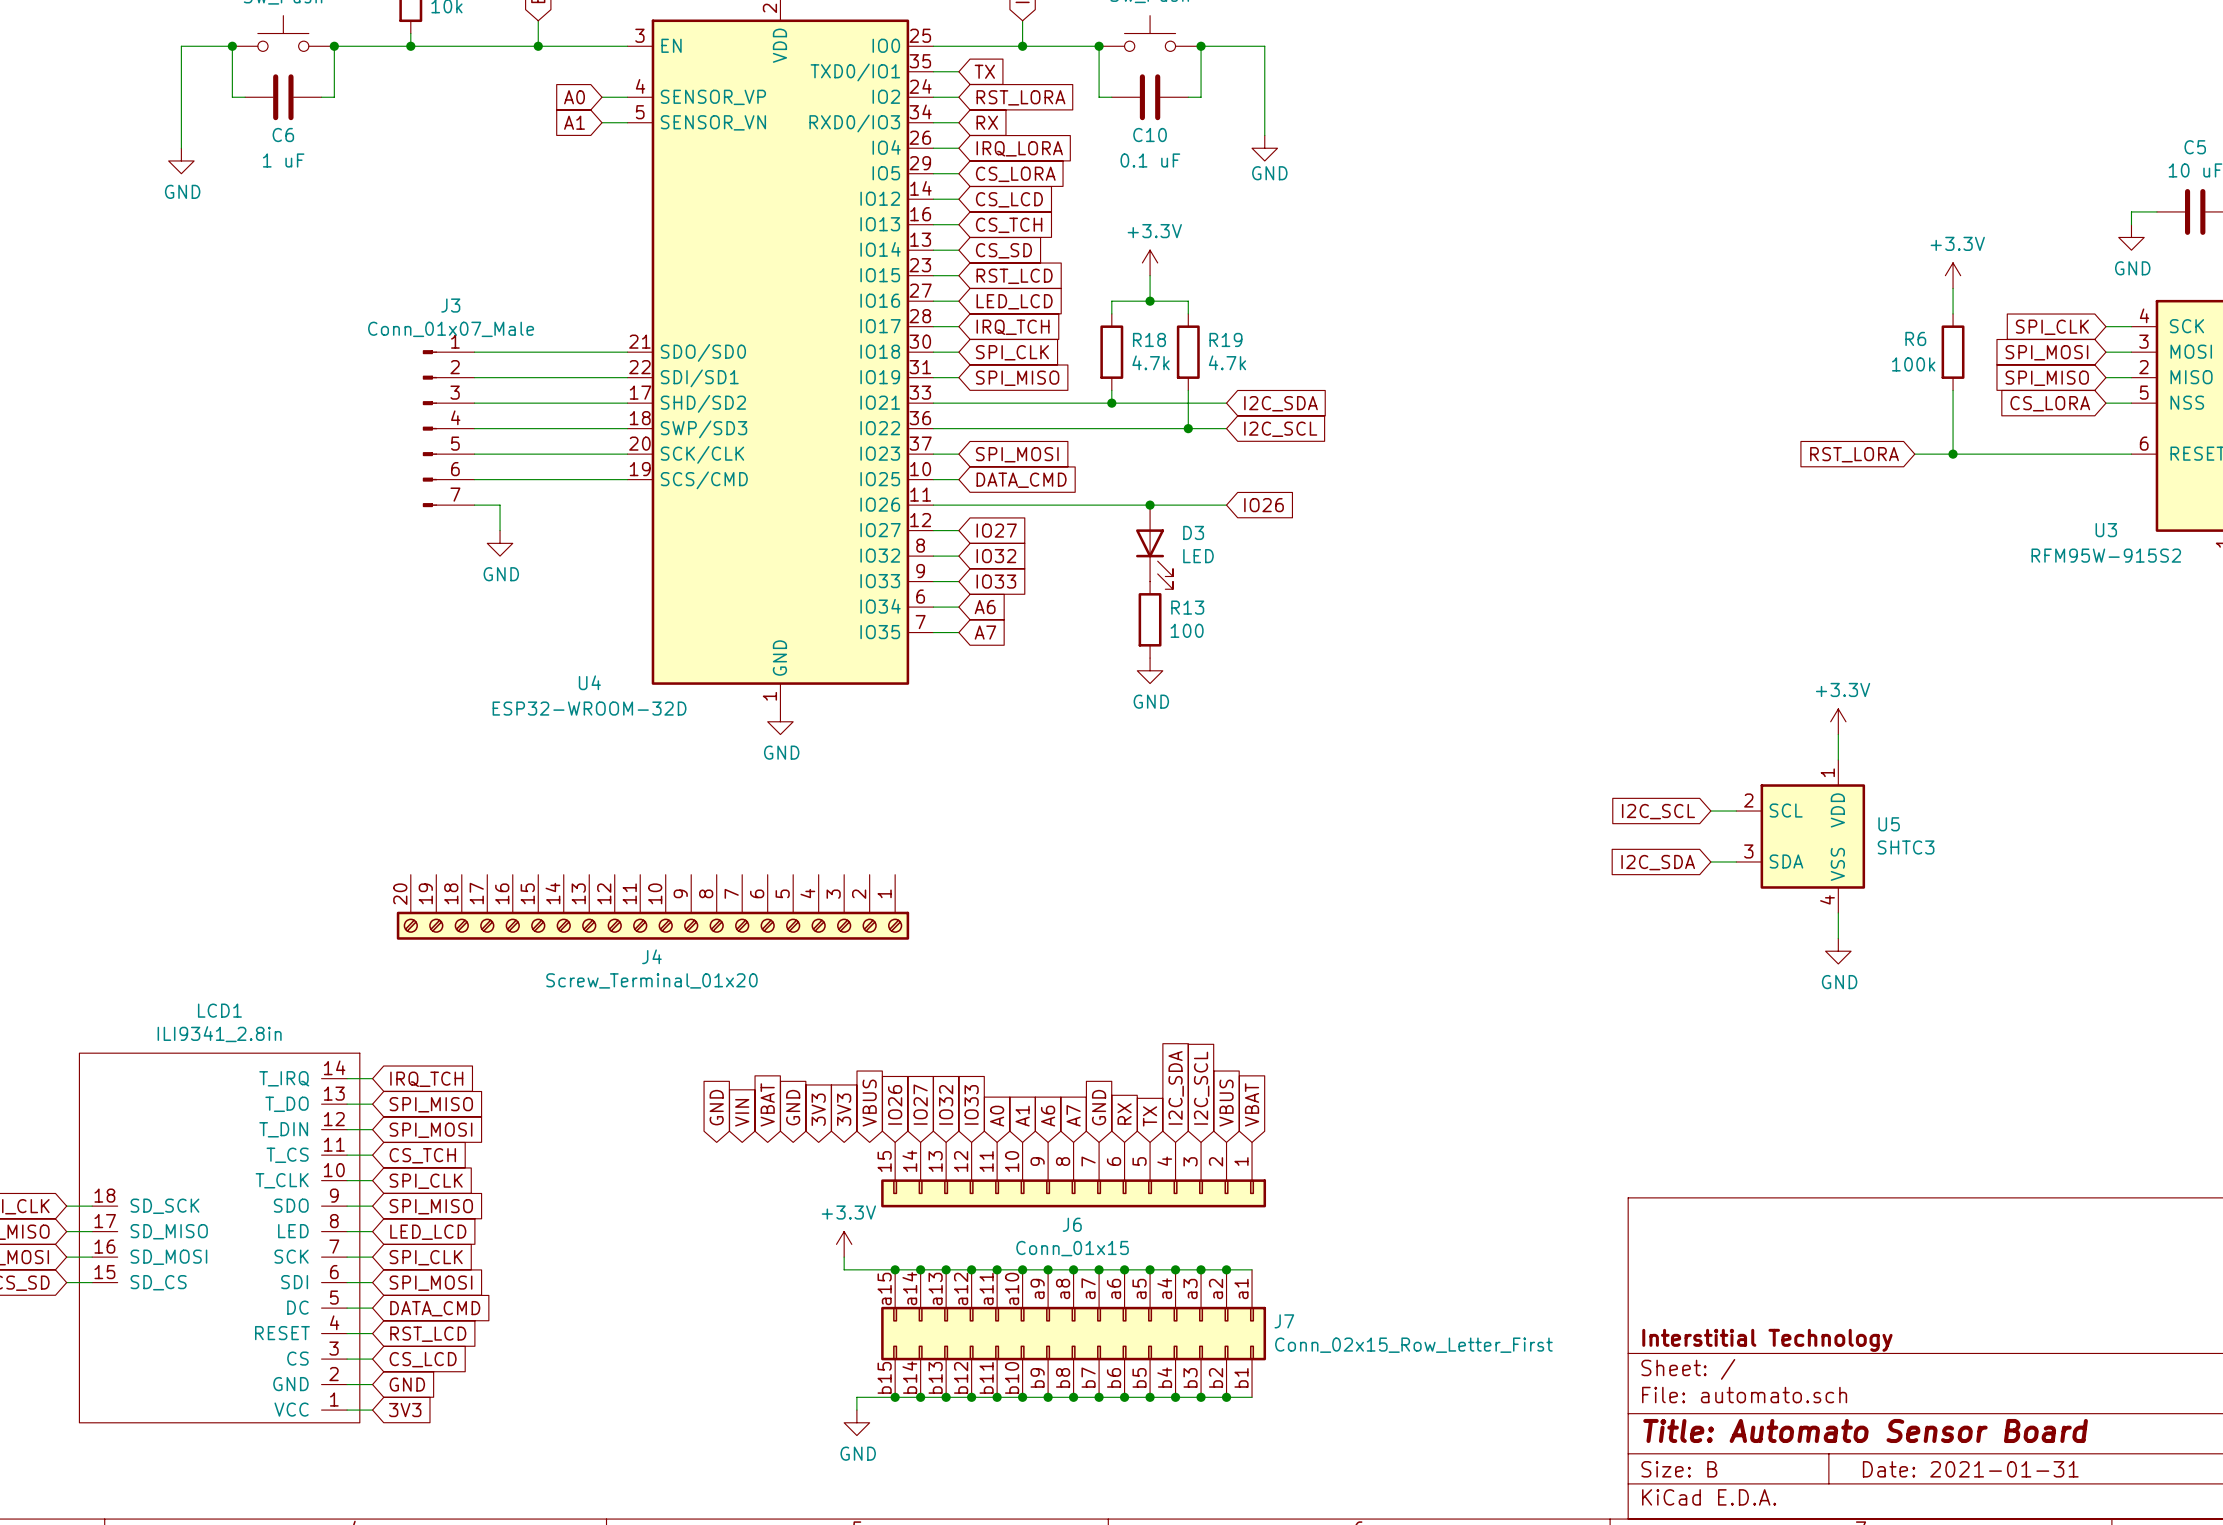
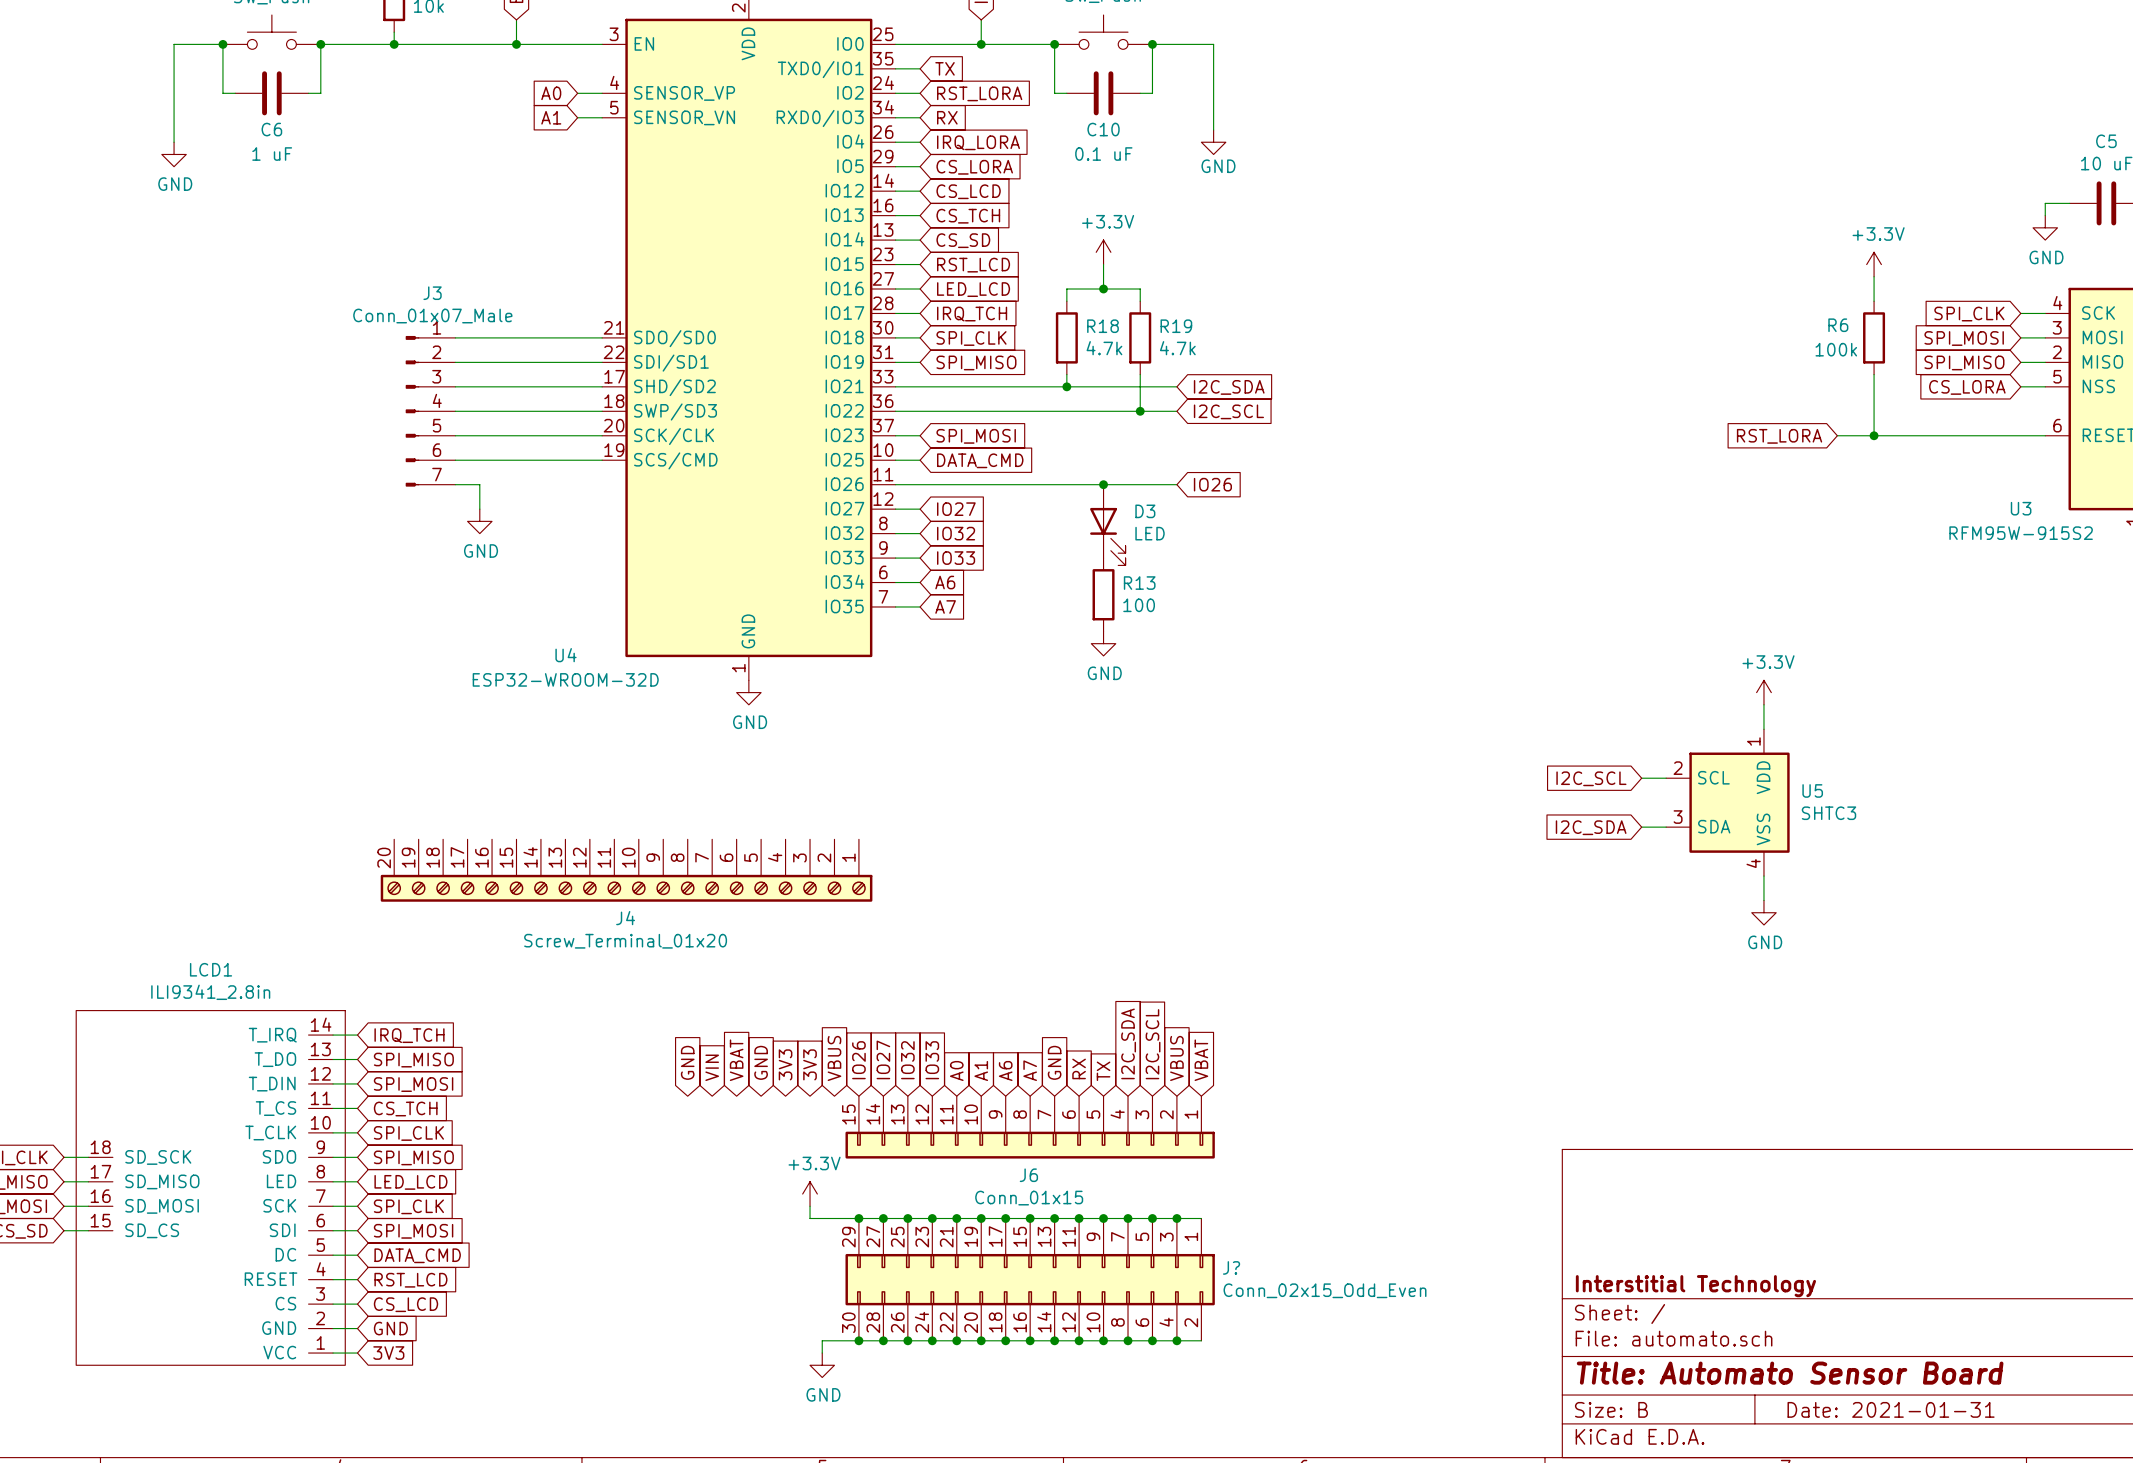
J7 symbol: [881, 1269, 1267, 1398] -> [845, 1218, 1215, 1341]
J7 name: J7 (1284, 1321) -> J? (1231, 1267)
J7 value: Conn_02x15_Row_Letter_First (1413, 1345) -> Conn_02x15_Odd_Even (1325, 1290)

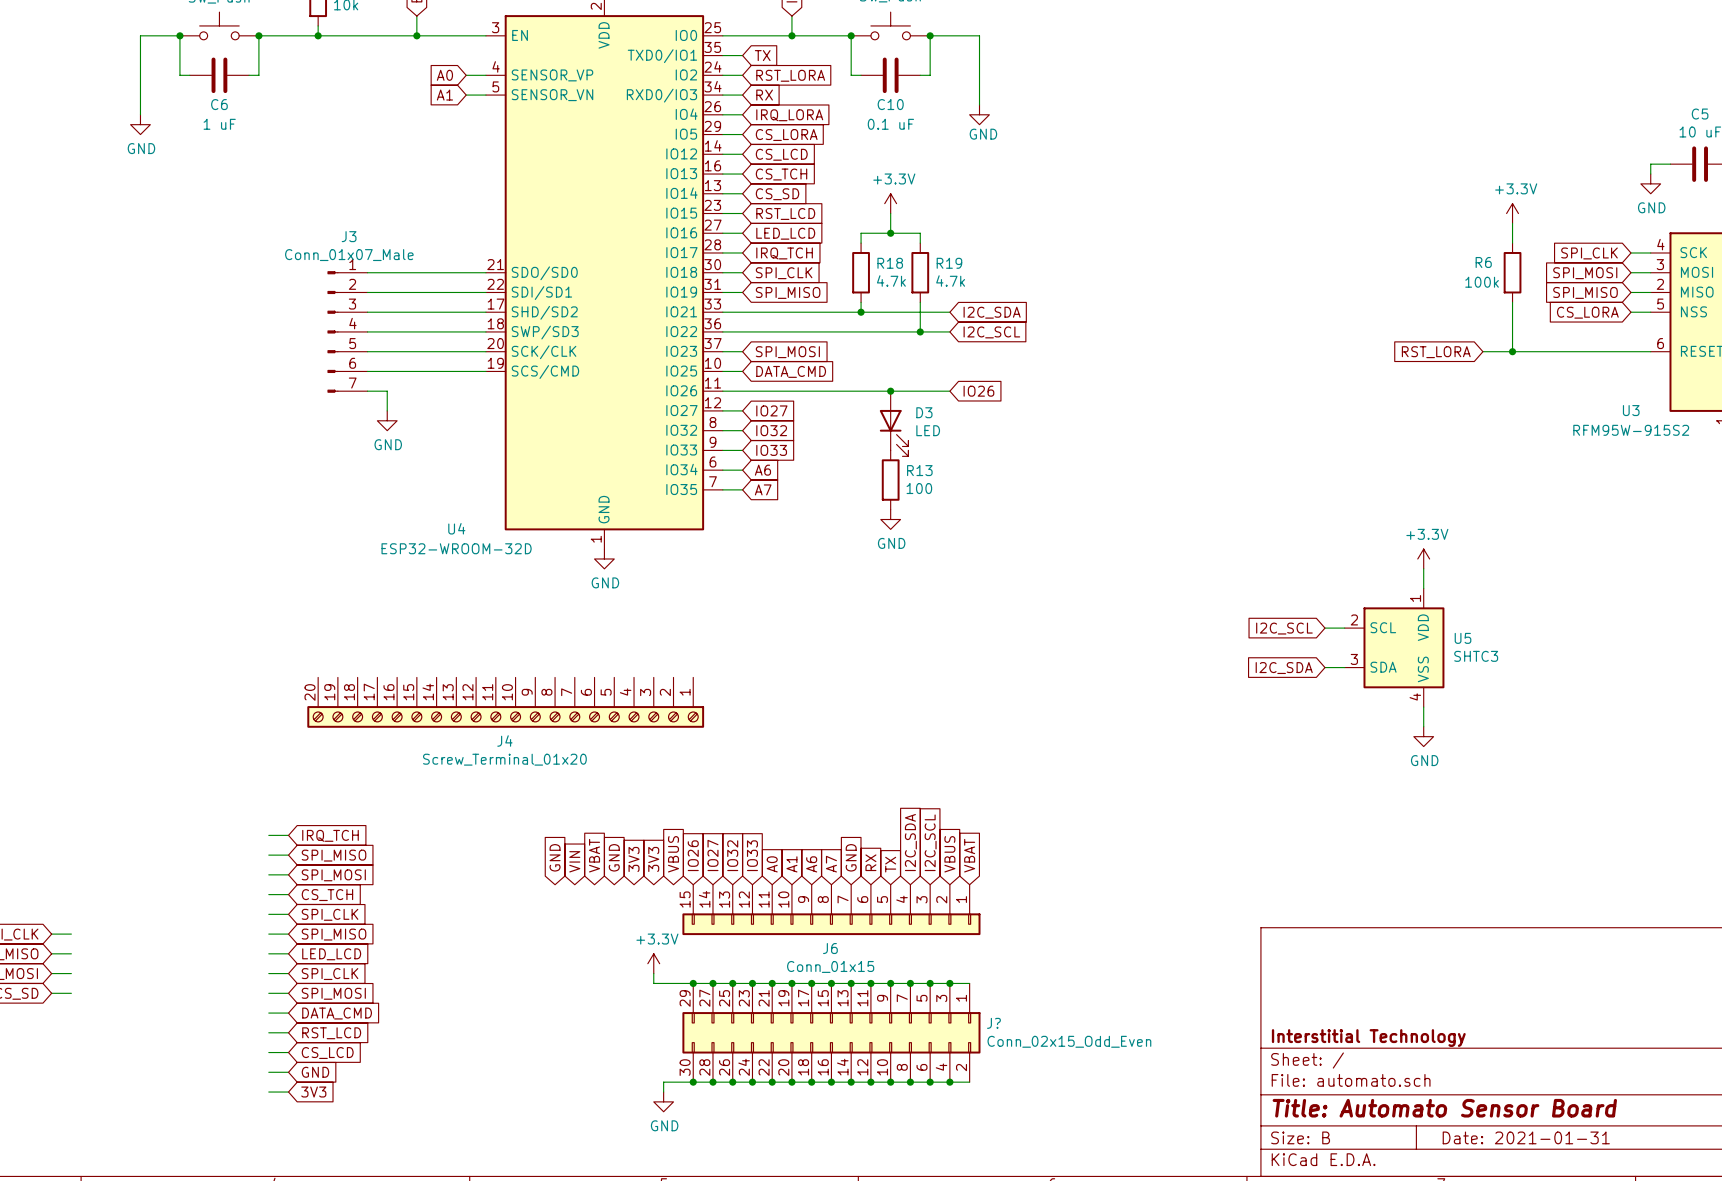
LCD1: ILI9341_2.8in (210, 1187) -> none

